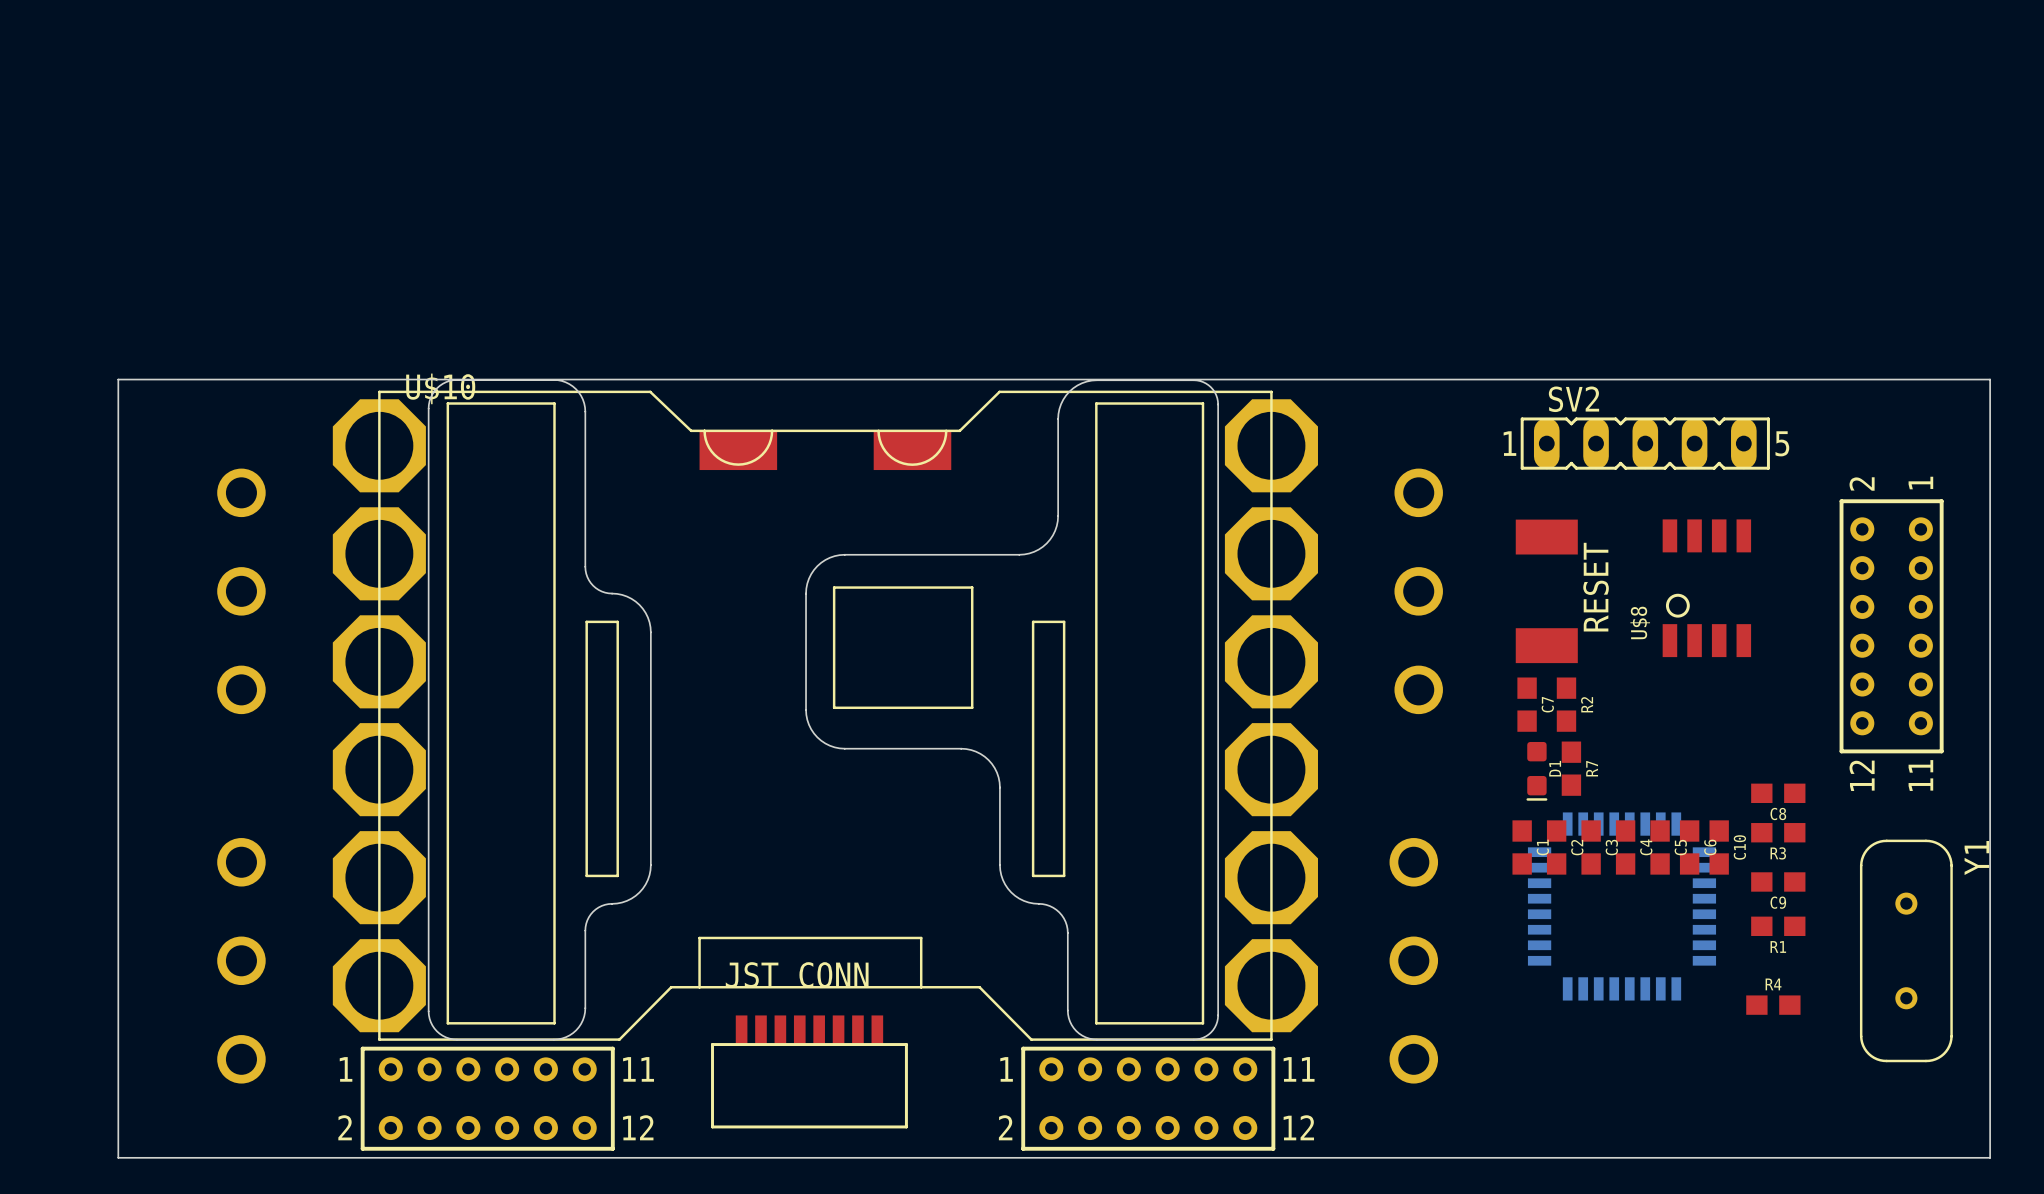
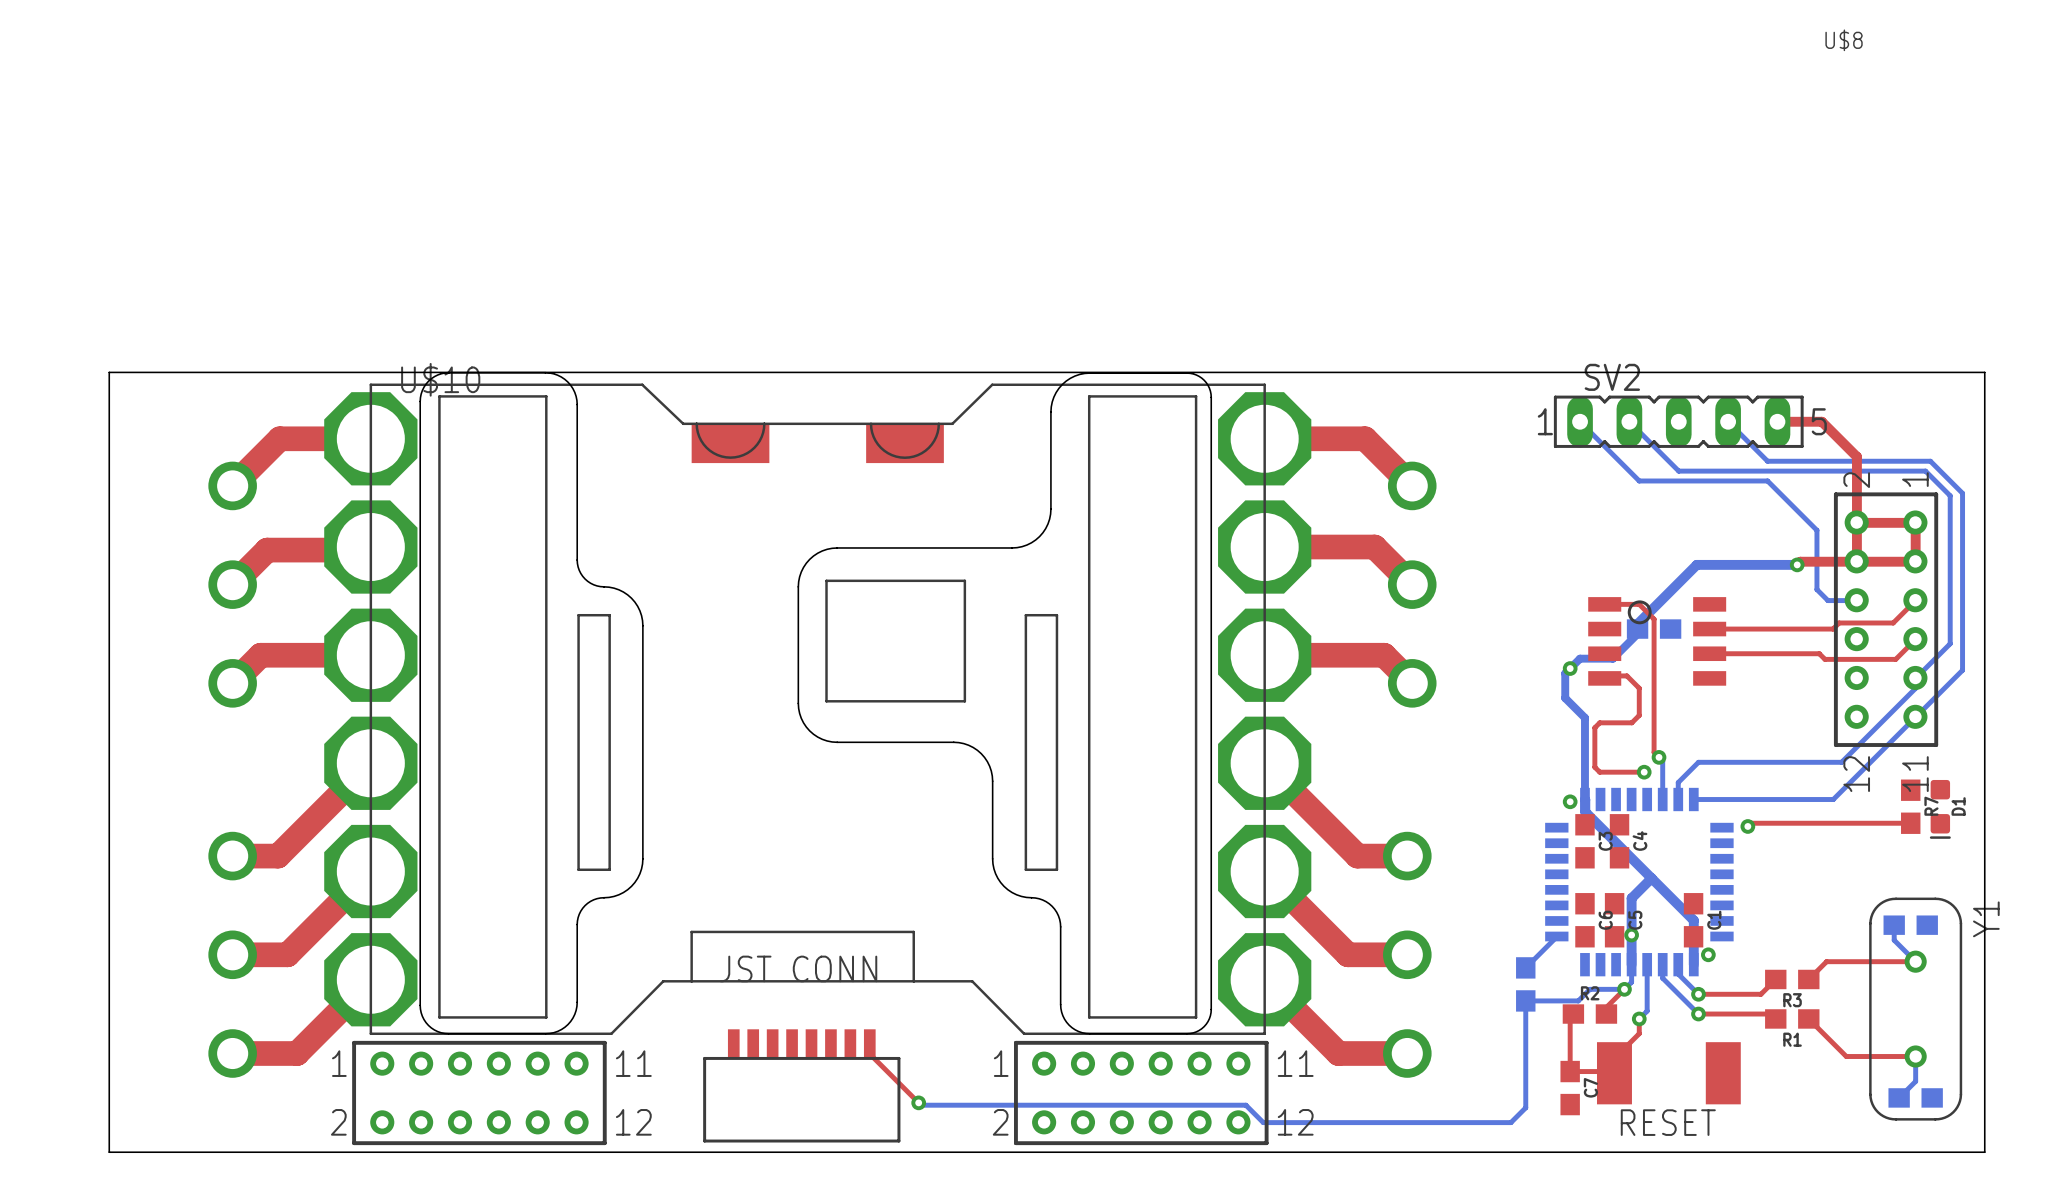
bottom track: none -> (1580, 421) (1639, 480) (1767, 480) (1816, 530) (1816, 589) (1827, 600) (1856, 600)
bottom track: none -> (1629, 421) (1678, 471) (1925, 471) (1950, 495) (1950, 643) (1915, 678) (1915, 688) (1841, 762) (1698, 762) (1678, 782) (1678, 799)
bottom track: none -> (1728, 421) (1767, 461) (1930, 461) (1962, 493) (1962, 670) (1833, 799) (1693, 799)
top track: none -> (1777, 421) (1821, 421) (1856, 456) (1856, 561)
SV2 position: (1645, 443) -> (1678, 421)
top track: none -> (370, 438) (279, 438) (232, 485)
top track: none -> (1264, 438) (1365, 438) (1412, 485)
top track: none -> (1856, 522) (1915, 522) (1915, 561) (1800, 561) (1797, 564)
top track: none -> (1264, 547) (1374, 547) (1412, 584)
top track: none -> (360, 550) (267, 550) (232, 584)
bottom track: none -> (1797, 564) (1696, 564) (1637, 624) (1637, 633) (1612, 658) (1580, 658) (1565, 673) (1565, 698) (1584, 717) (1585, 811) (1693, 920) (1693, 964)
via: none -> (1797, 564)
U$8 rotation: 0° (1706, 588) -> 90° clockwise (1657, 641)
RESET: (1546, 591) -> none
top track: none -> (1915, 600) (1893, 622) (1839, 622) (1833, 629) (1709, 629)
top track: none -> (1604, 604) (1639, 604) (1654, 619) (1654, 752) (1659, 757)
U$8 name position: U$8 (1640, 622) -> U$8 (1844, 40)
top track: none -> (1915, 639) (1895, 659) (1825, 659) (1819, 653) (1709, 653)
top track: none -> (370, 655) (260, 655) (232, 683)
top track: none -> (1264, 655) (1384, 655) (1412, 683)
via: none -> (1570, 668)
top track: none -> (1604, 678) (1607, 675) (1626, 675) (1639, 688) (1639, 715) (1631, 722) (1599, 722) (1594, 727) (1594, 767) (1599, 772) (1644, 772)
C7 position: (1527, 704) -> (1570, 1088)
R2 rotation: 0° (1566, 704) -> 90° clockwise (1589, 1014)
R2 position: (1566, 704) -> (1589, 1014)
bottom track: none -> (1659, 757) (1662, 761) (1662, 799)
via: none -> (1659, 757)
R7 position: (1571, 768) -> (1910, 806)
top track: none -> (370, 763) (278, 856) (232, 856)
top track: none -> (1264, 763) (1357, 856) (1407, 856)
D1 position: (1536, 771) -> (1940, 809)
via: none -> (1644, 772)
C8 side: top (1778, 793) -> bottom (1910, 925)
via: none -> (1570, 801)
top track: none -> (1910, 823) (1751, 823) (1747, 826)
via: none -> (1747, 826)
R3 position: (1778, 832) -> (1792, 979)
C1 position: (1522, 847) -> (1693, 920)
C2: (1556, 847) -> none
C5 position: (1660, 847) -> (1614, 920)
C6 position: (1689, 847) -> (1584, 920)
C10 side: top (1719, 847) -> bottom (1654, 629)
top track: none -> (370, 871) (287, 954) (232, 954)
top track: none -> (1264, 871) (1347, 954) (1397, 954)
C9 side: top (1778, 881) -> bottom (1915, 1097)
bottom track: none -> (1651, 878) (1631, 898) (1631, 982) (1624, 989) (1589, 989) (1578, 1000) (1525, 1000) (1525, 1107) (1510, 1122) (1263, 1122) (1245, 1105) (921, 1105) (918, 1102)
part position: (1621, 906) -> (1639, 882)
R1 position: (1778, 926) -> (1792, 1018)
bottom track: none -> (1894, 925) (1894, 940) (1915, 961)
via: none -> (1631, 935)
bottom track: none -> (1556, 936) (1525, 967)
Y1 position: (1906, 950) -> (1915, 1009)
via: none -> (1708, 954)
top track: none -> (1915, 961) (1826, 961) (1808, 979)
bottom track: none -> (1647, 964) (1647, 1011) (1639, 1018)
bottom track: none -> (1662, 964) (1662, 978) (1698, 1014)
bottom track: none -> (1678, 964) (1678, 974) (1698, 994)
top track: none -> (370, 979) (297, 1053) (232, 1053)
top track: none -> (1264, 979) (1338, 1053) (1407, 1053)
top track: none -> (1775, 979) (1760, 994) (1698, 994)
top track: none -> (1624, 989) (1606, 1007) (1606, 1014)
via: none -> (1624, 989)
via: none -> (1698, 994)
R4 side: top (1773, 1005) -> bottom (1525, 984)
top track: none -> (1573, 1014) (1570, 1017) (1570, 1071) (1612, 1071) (1614, 1073) (1614, 1058) (1639, 1033) (1639, 1018)
top track: none -> (1698, 1014) (1770, 1014) (1775, 1018)
via: none -> (1698, 1014)
via: none -> (1639, 1018)
top track: none -> (1808, 1018) (1846, 1056) (1915, 1056)
top track: none -> (869, 1053) (918, 1102)
bottom track: none -> (1915, 1056) (1915, 1081) (1899, 1097)
part position: (809, 1071) -> (801, 1085)
RESET: none -> (1668, 1073)
via: none -> (918, 1102)

